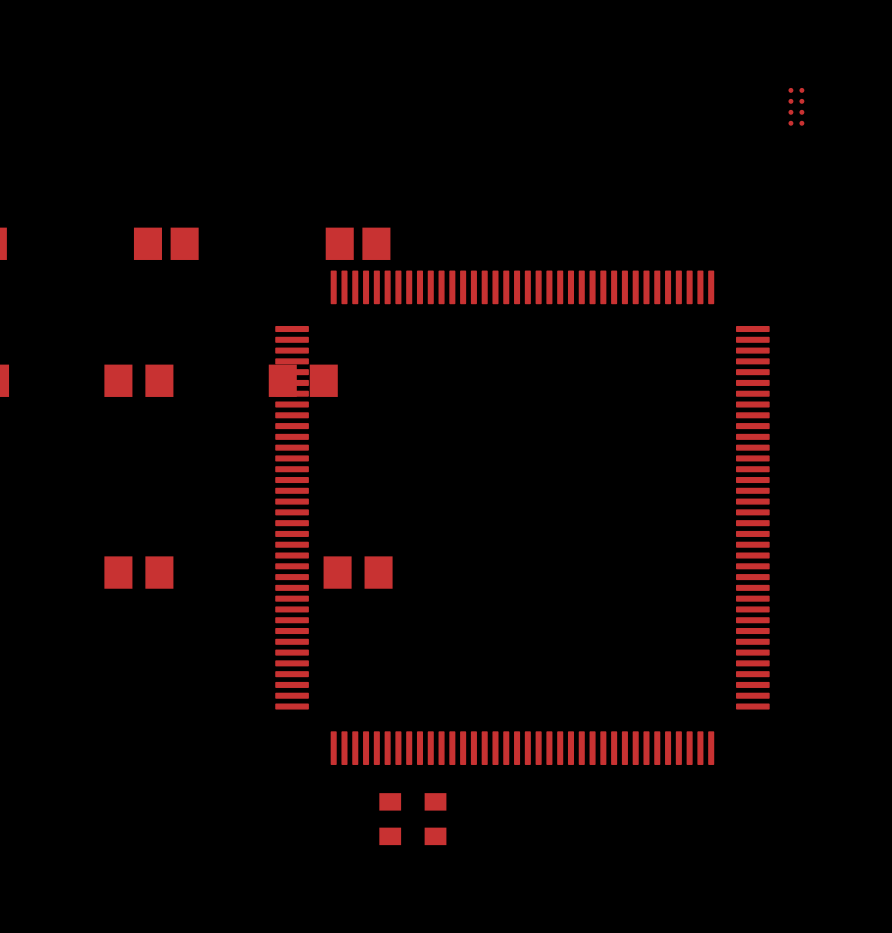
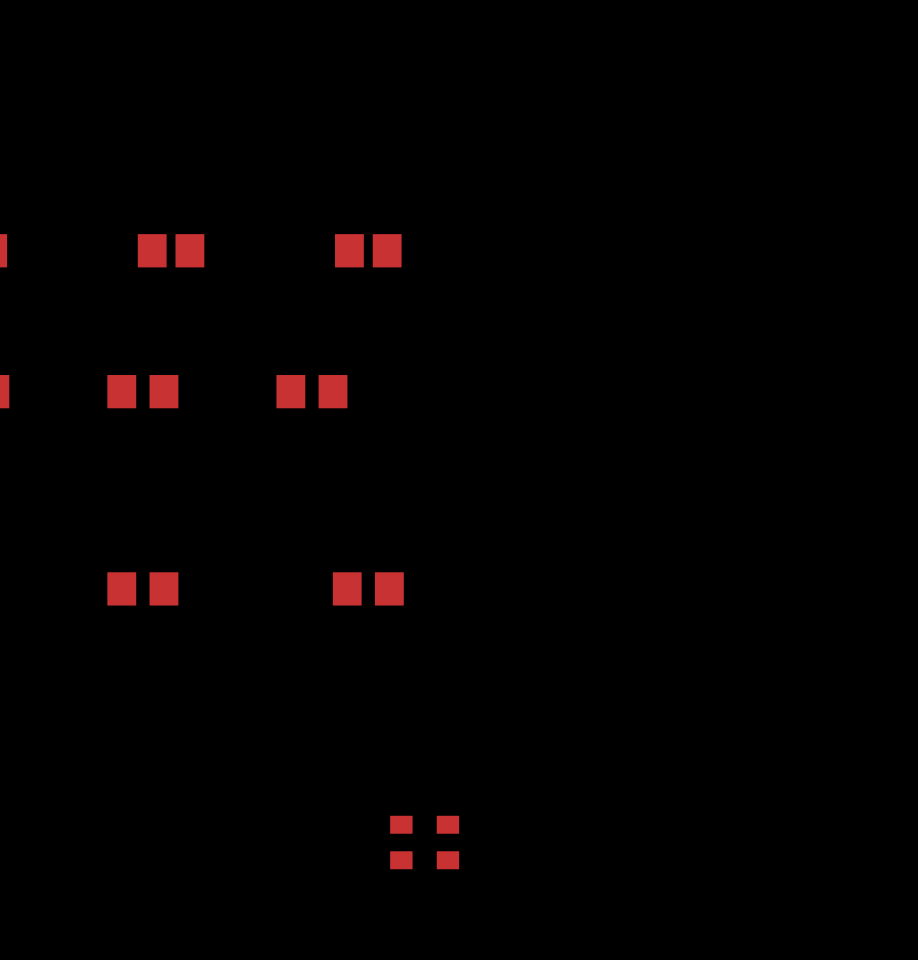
part: (796, 106) -> none
part: (522, 517) -> none

